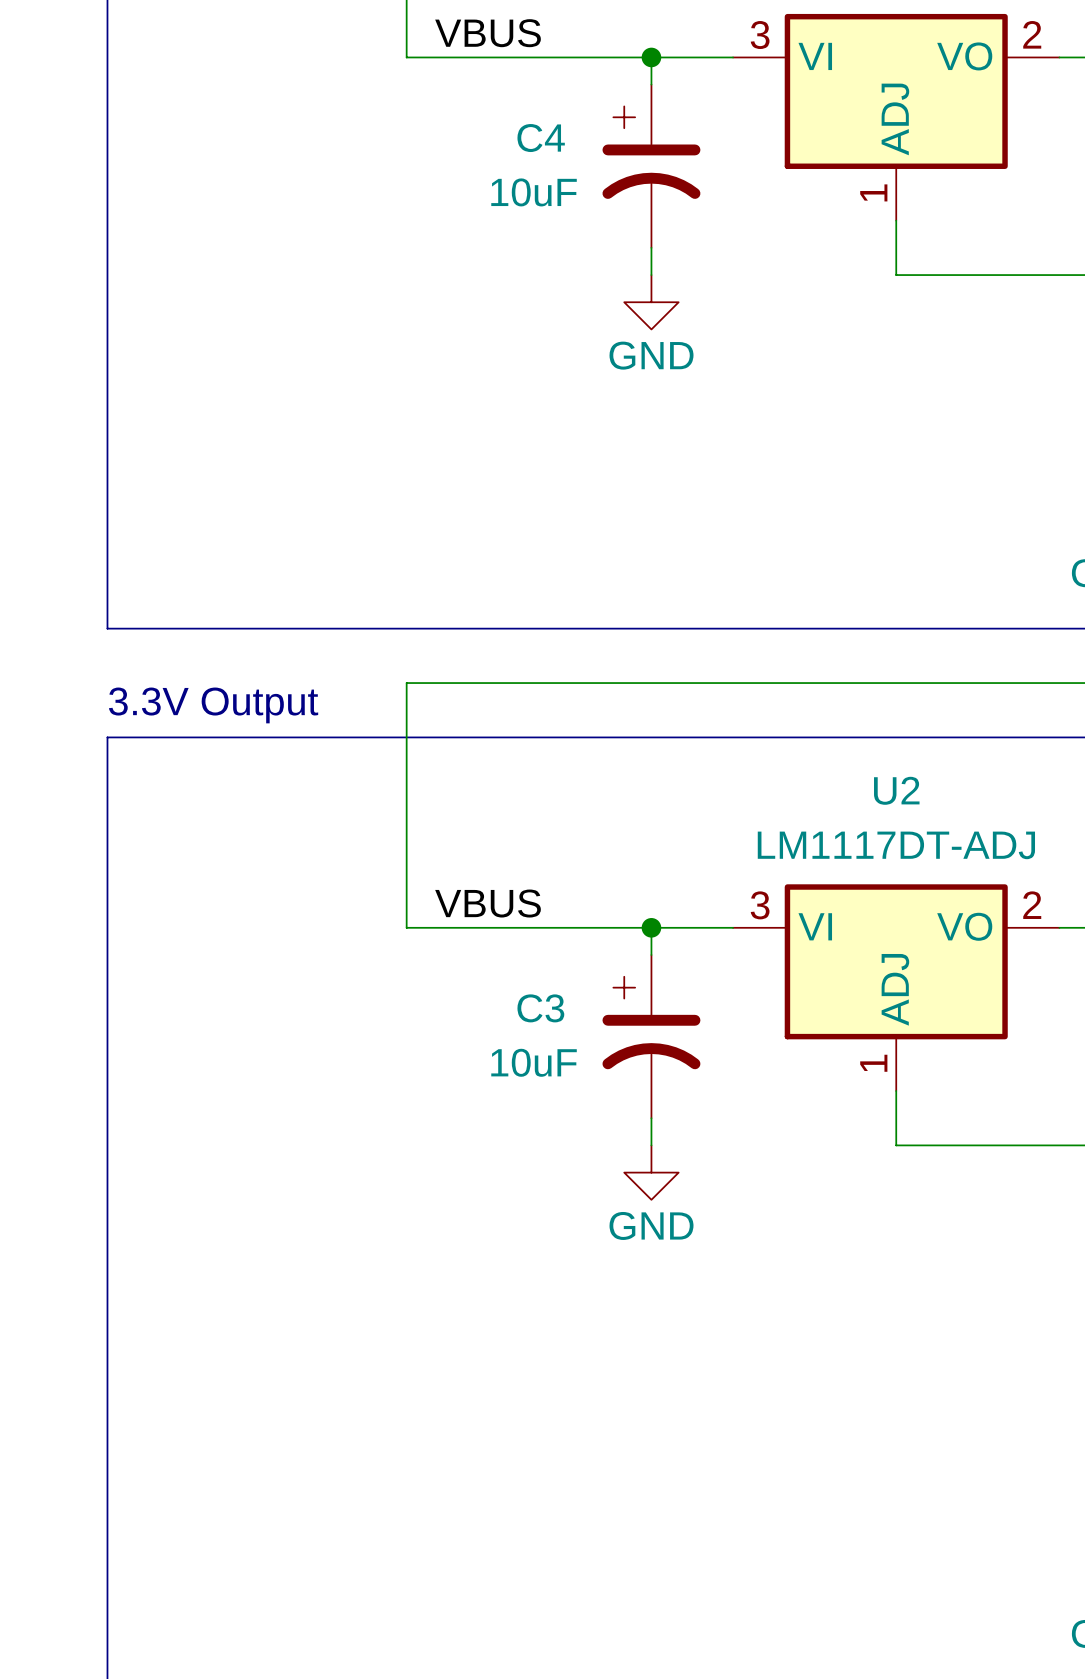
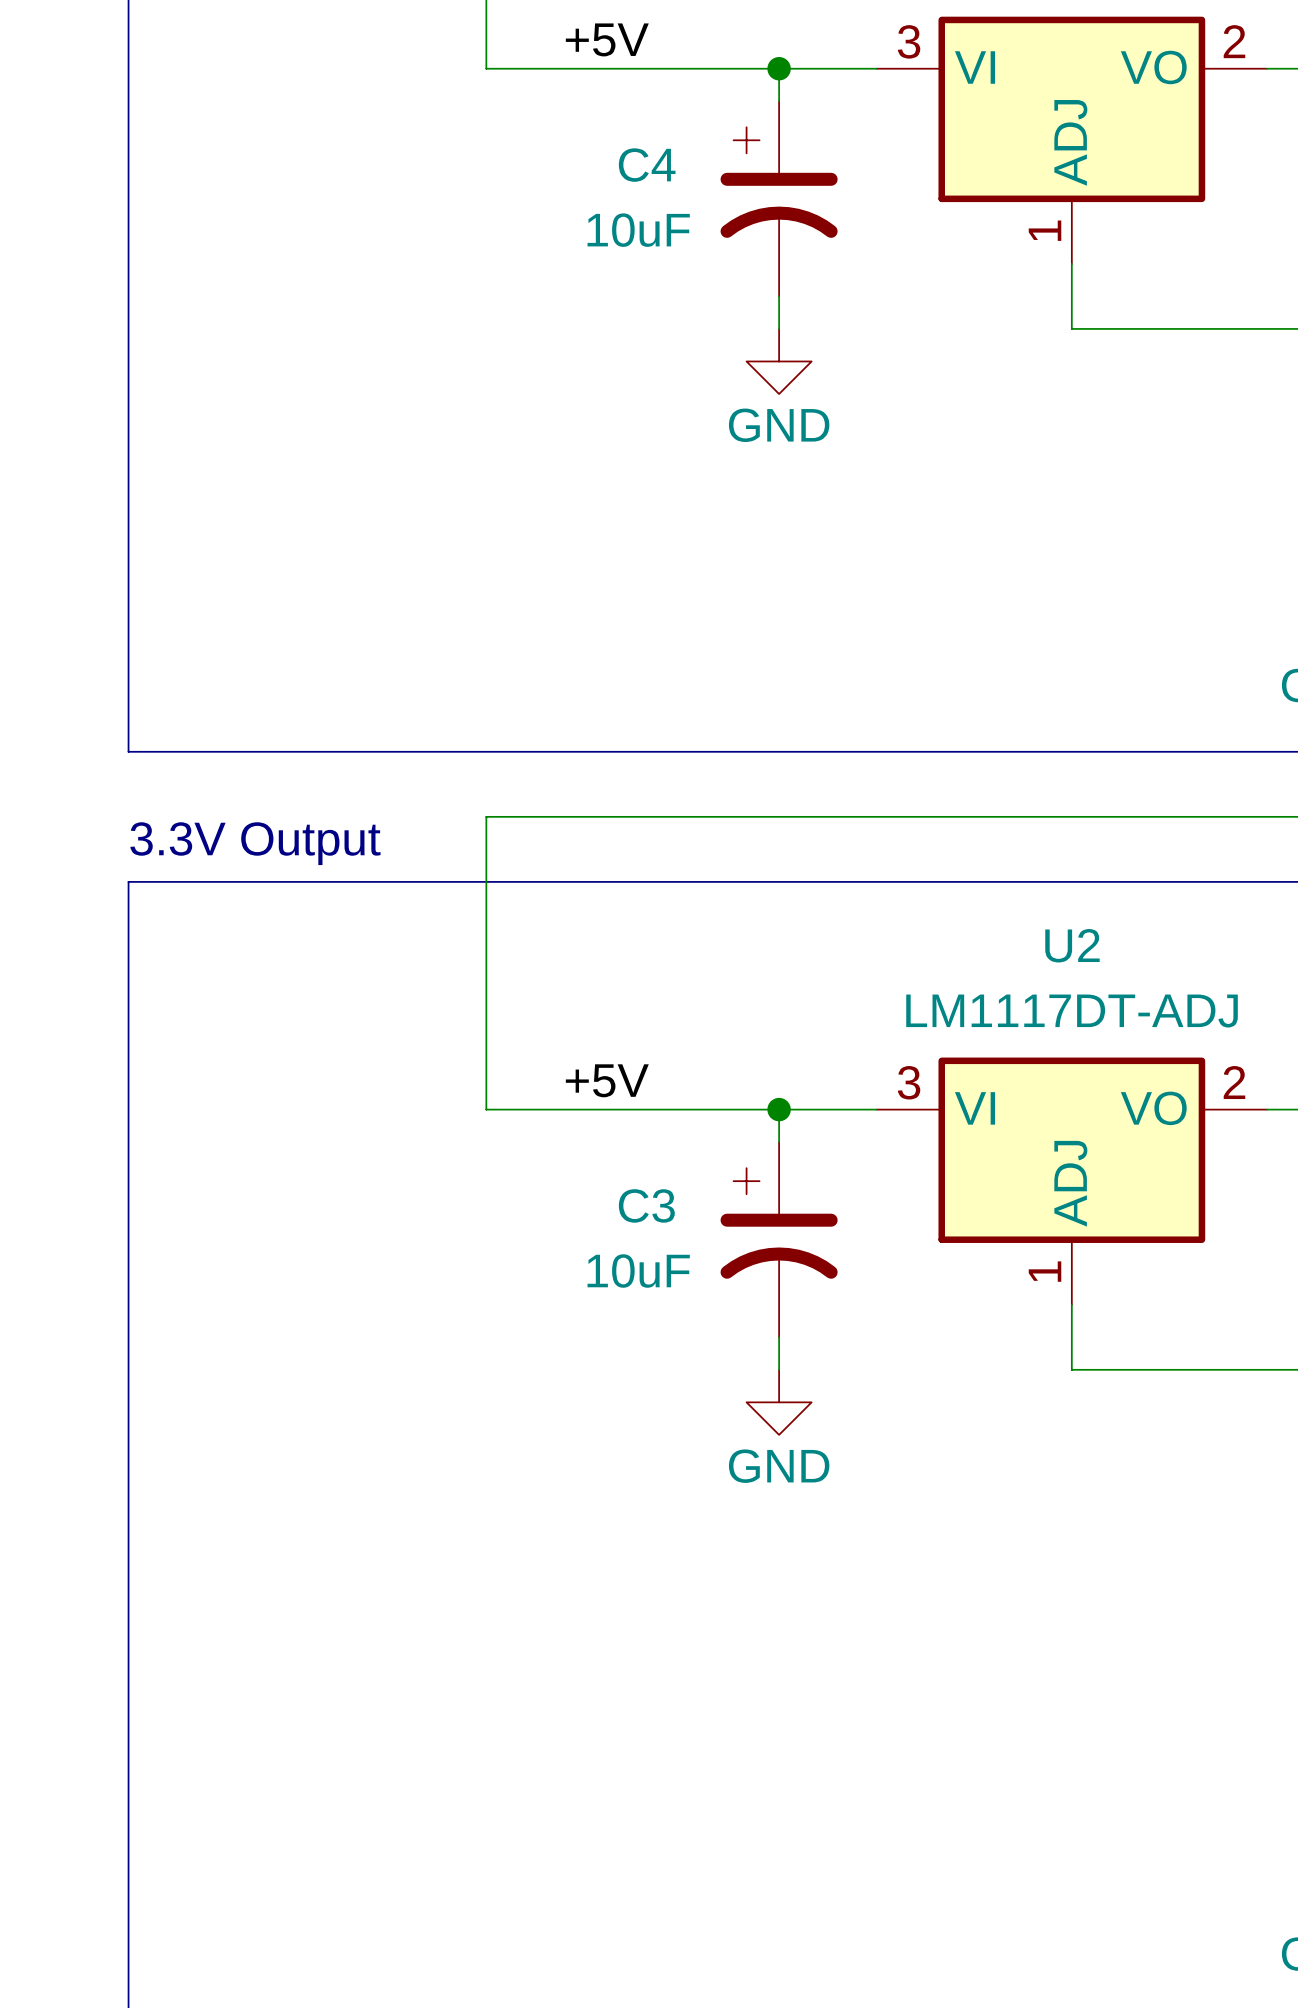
label: VBUS (488, 33) -> +5V (607, 39)
label: VBUS (488, 903) -> +5V (607, 1080)

